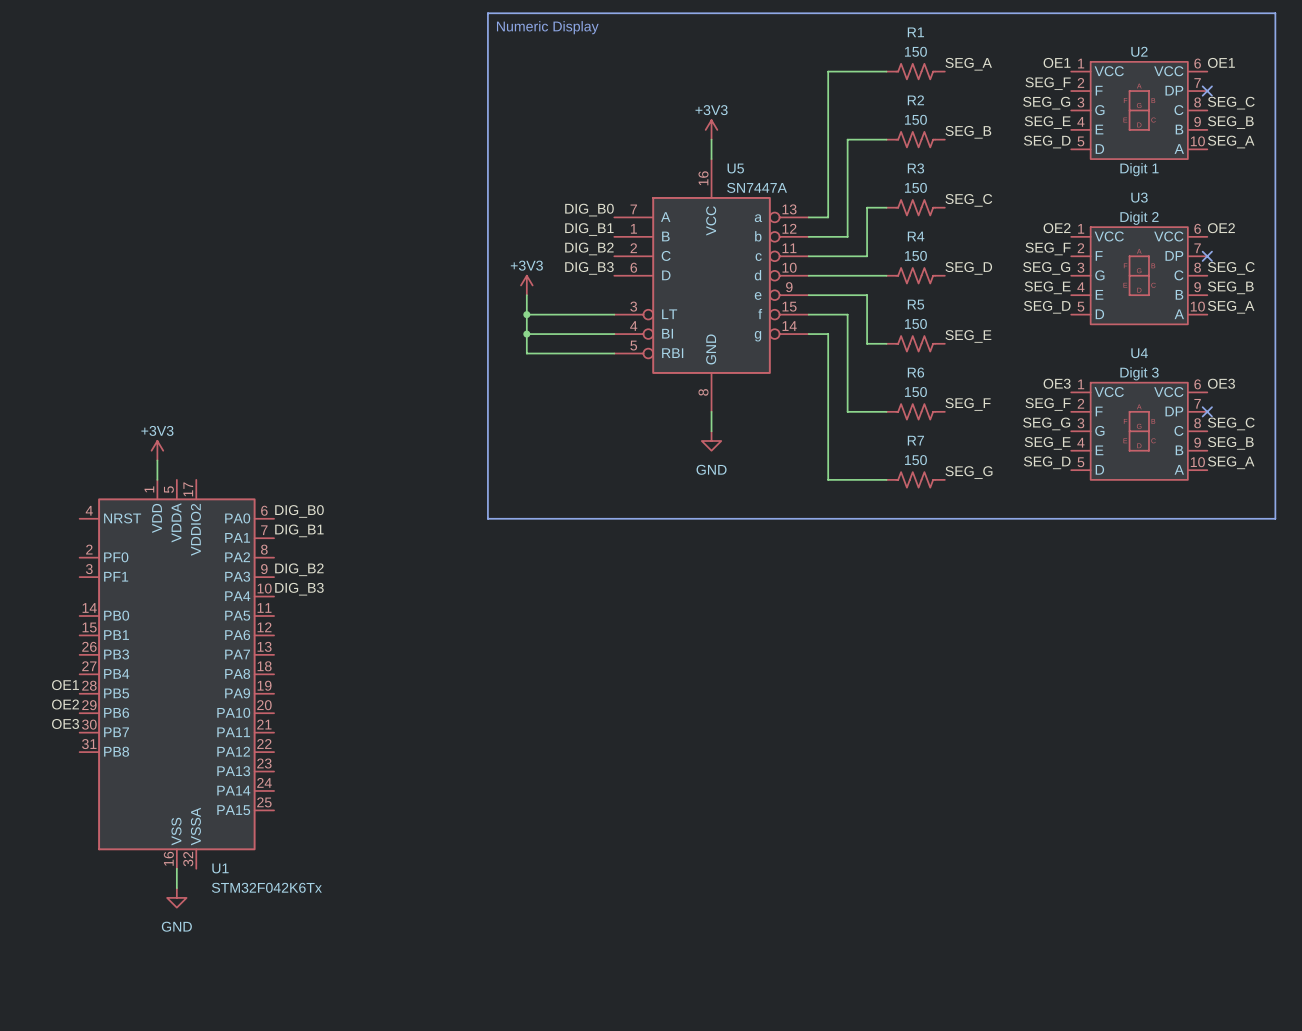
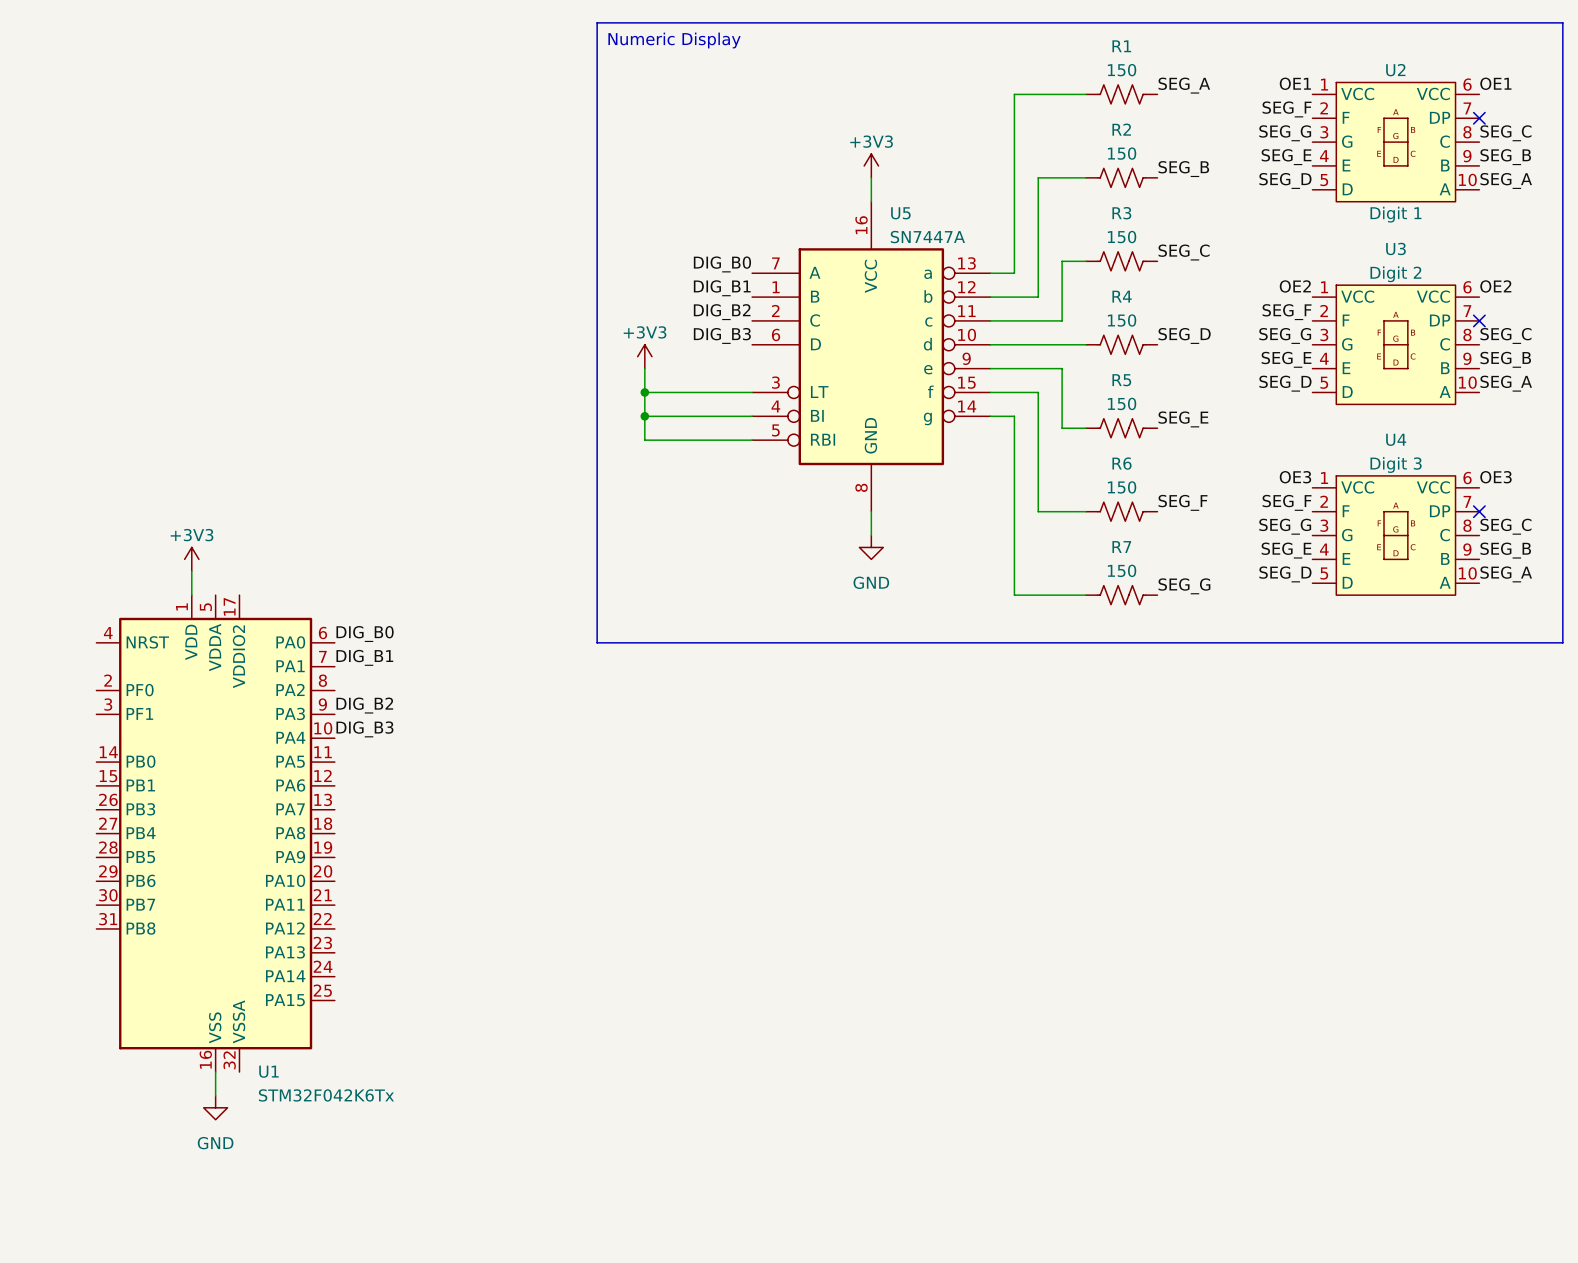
label: OE1 (65, 685) -> none
label: OE2 (65, 704) -> none
label: OE3 (65, 723) -> none

